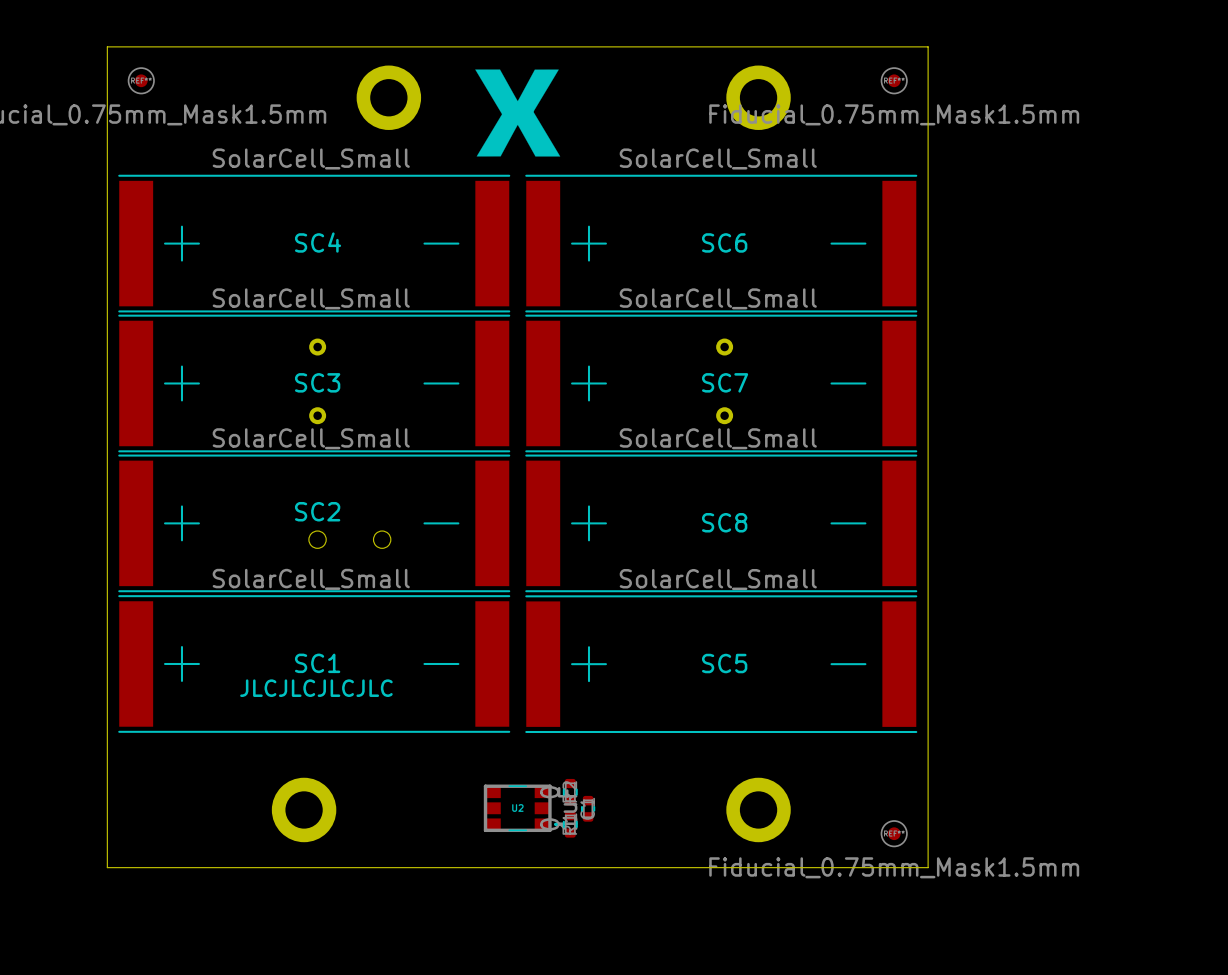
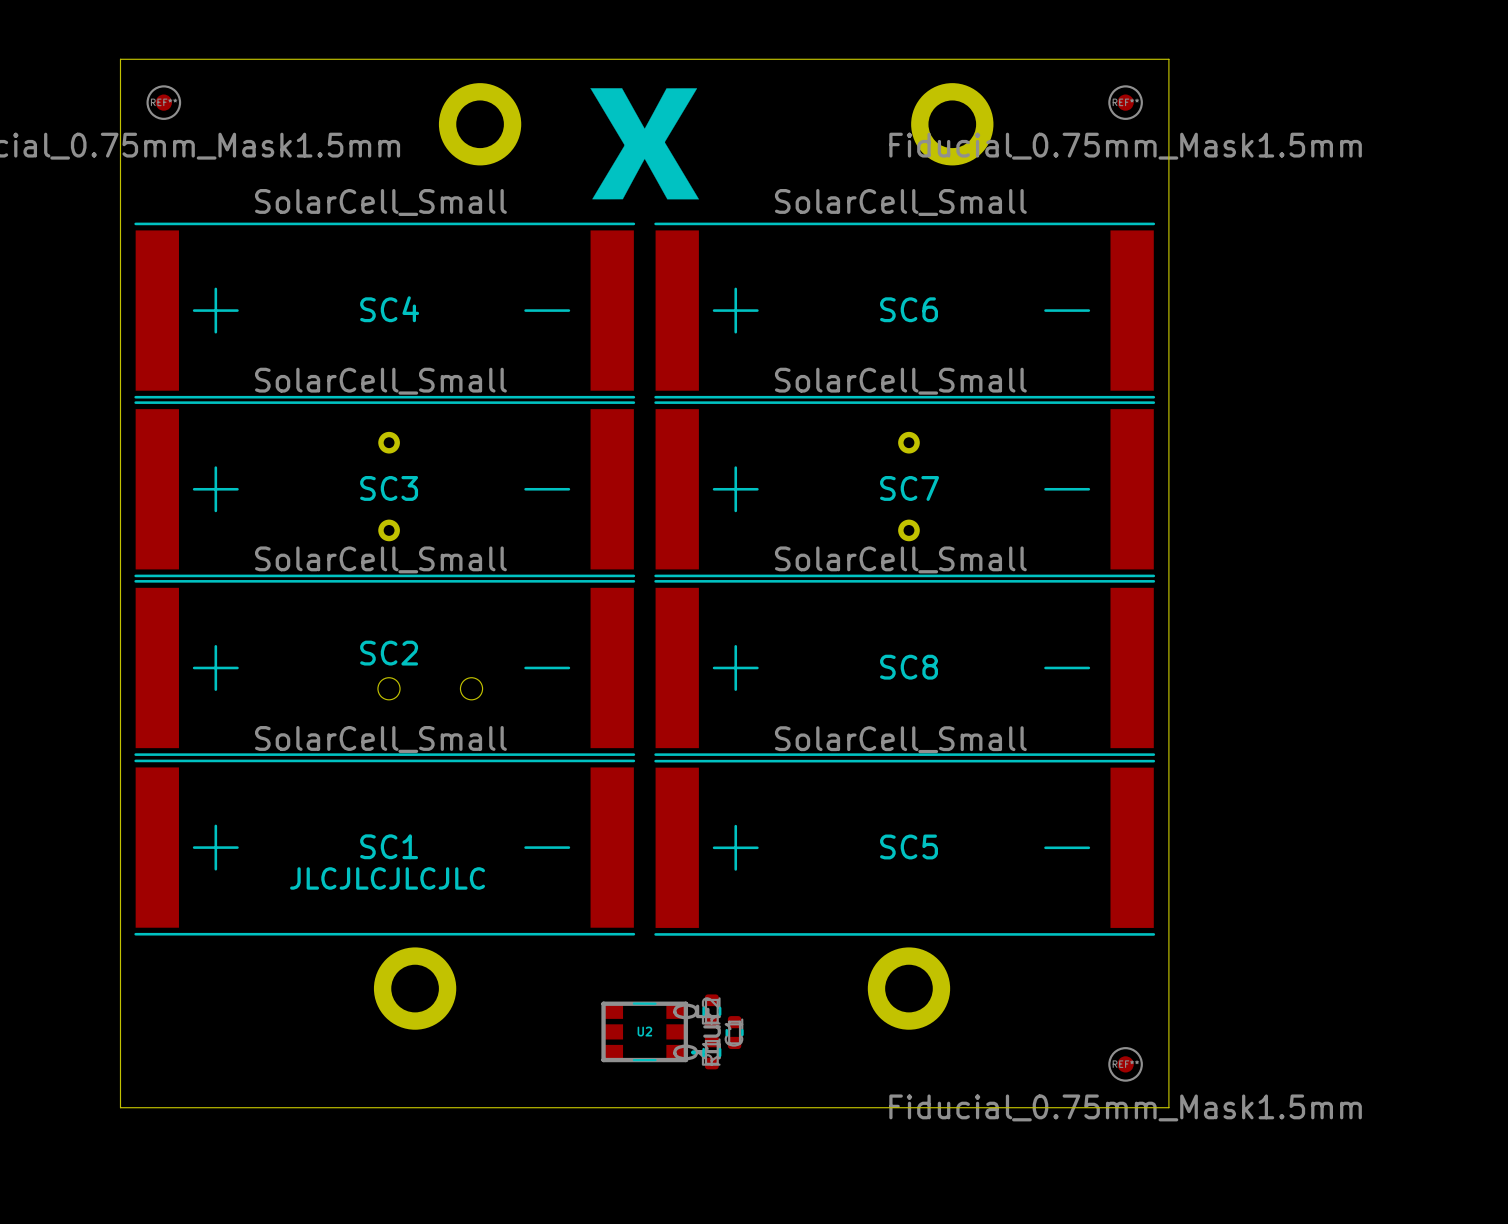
part position: (304, 809) -> (415, 988)
part position: (758, 809) -> (908, 988)

